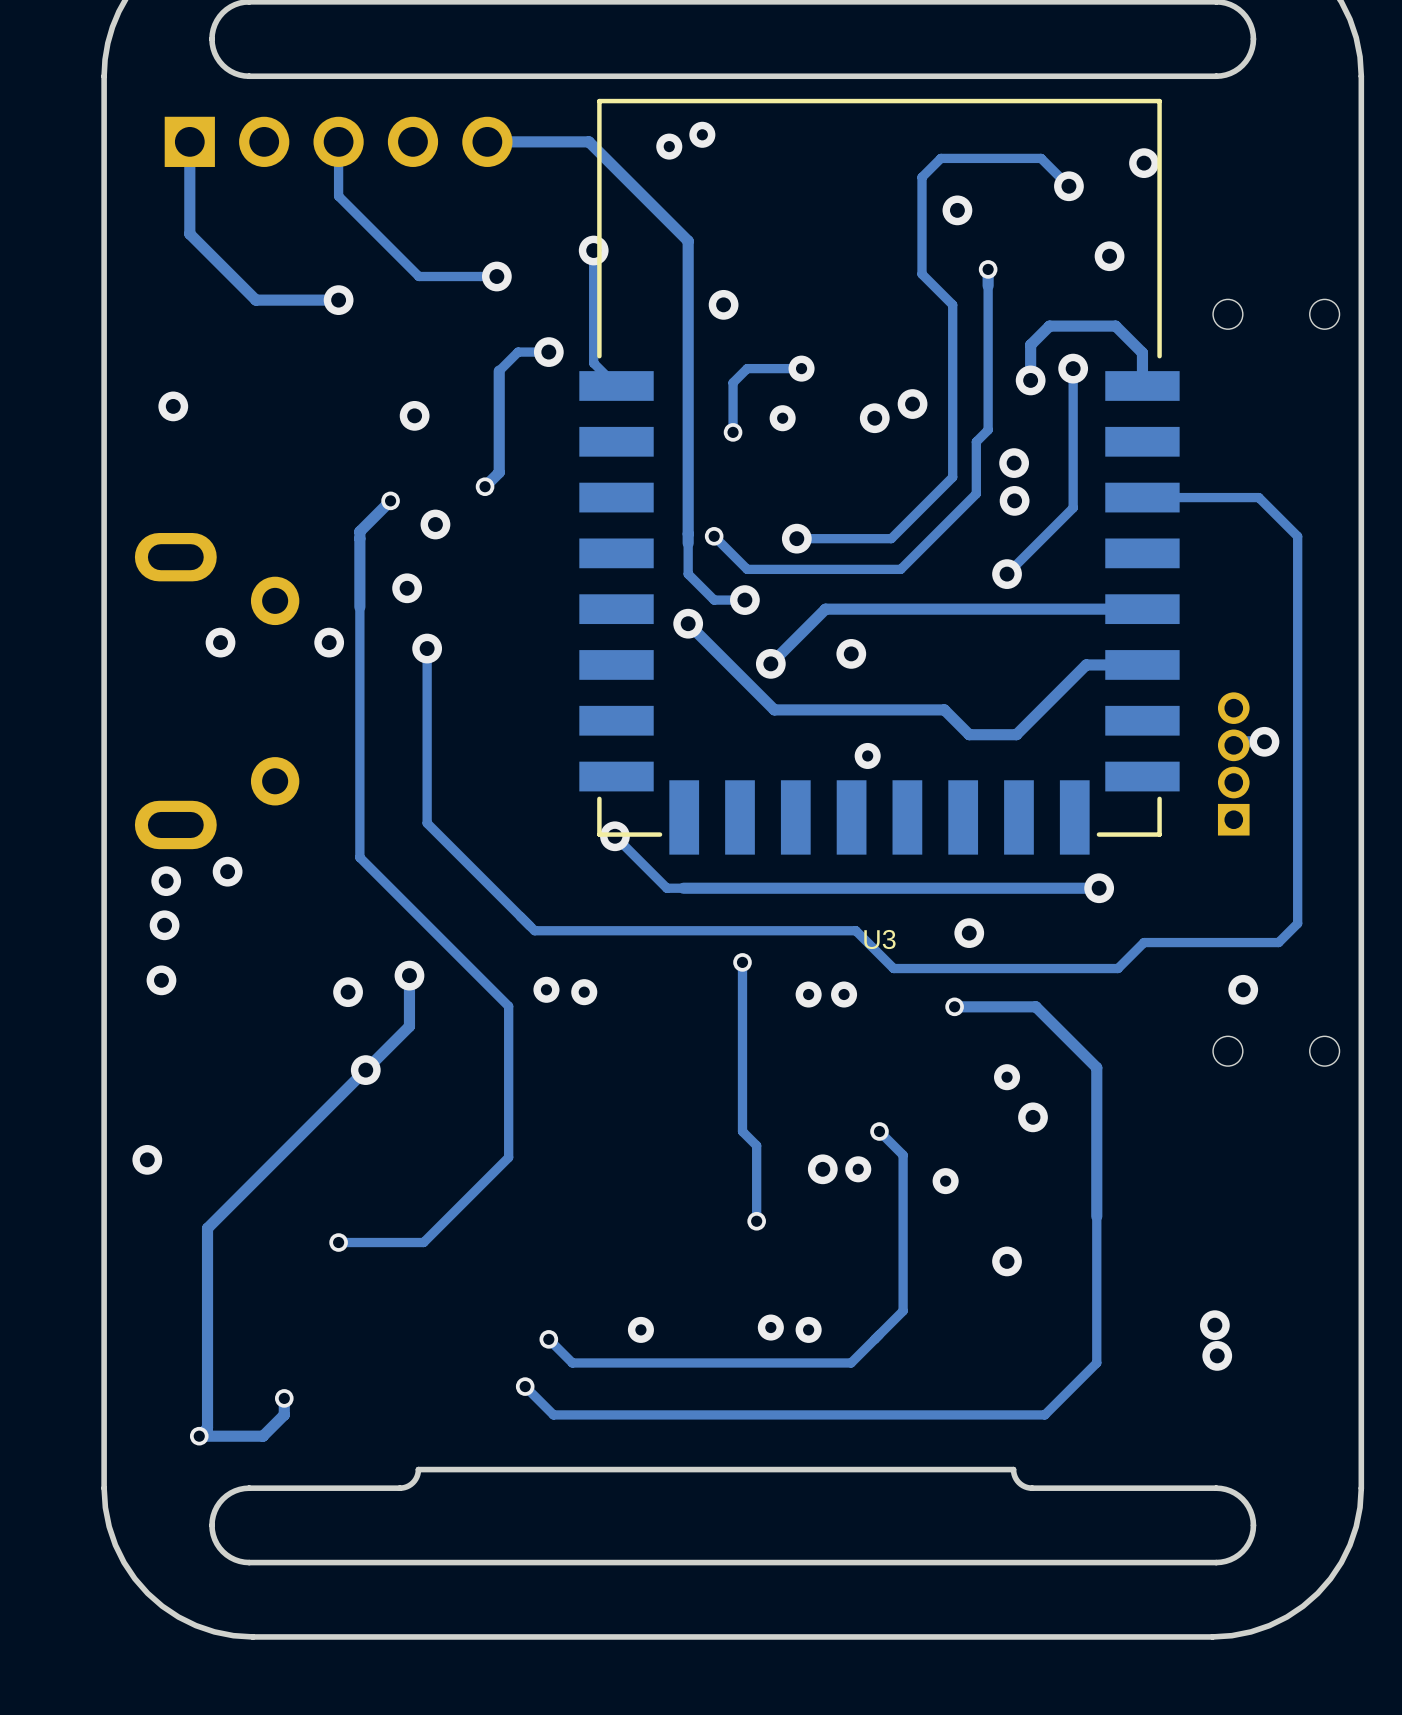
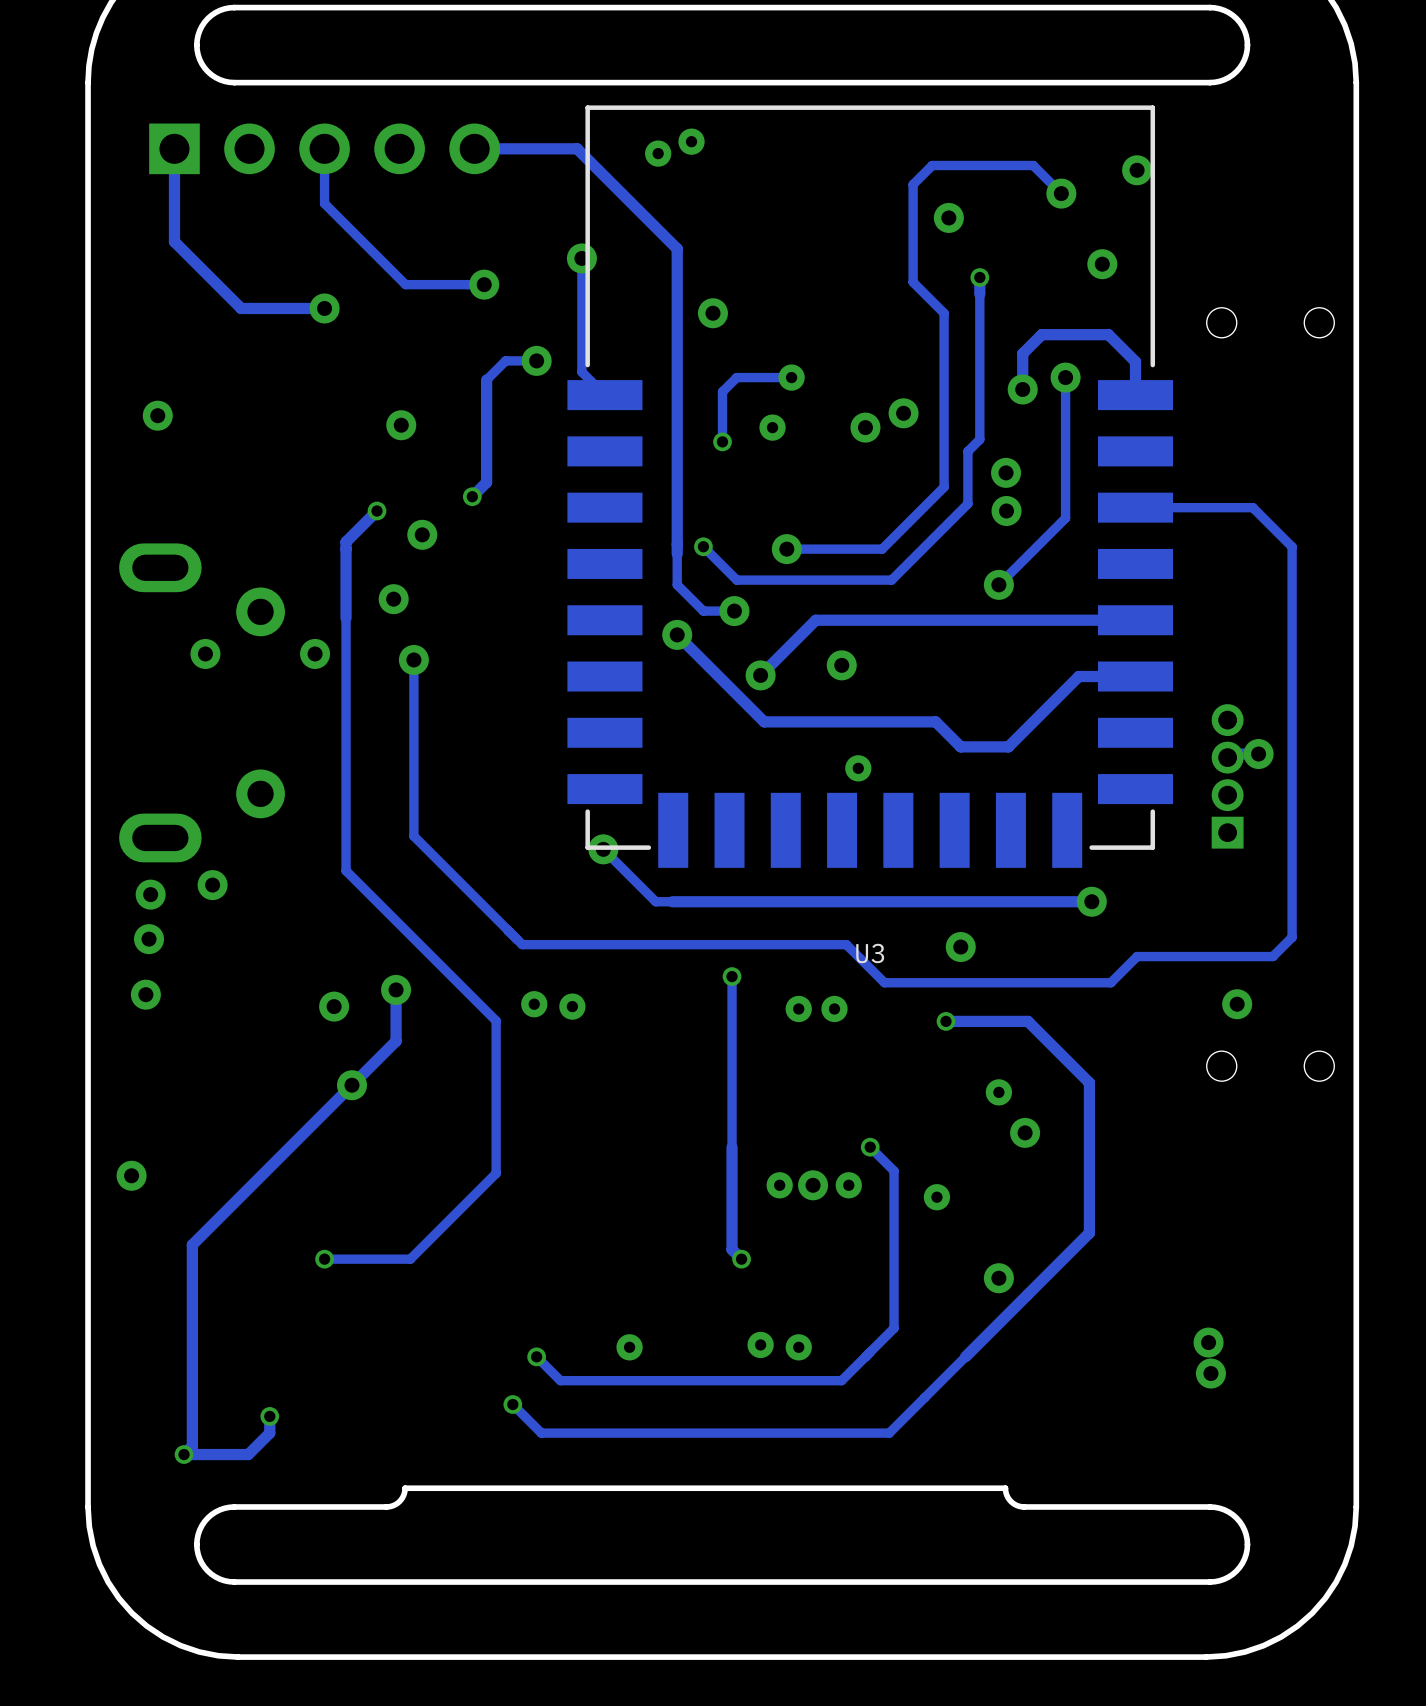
track: (742, 1131) (756, 1145) (756, 1221) -> (732, 1147) (732, 1249) (741, 1259)
via: none -> (779, 1185)
track: (1096, 1216) (1096, 1362) (1044, 1414) (898, 1414) -> (1089, 1232) (889, 1433)
via position: (756, 1221) -> (741, 1259)

